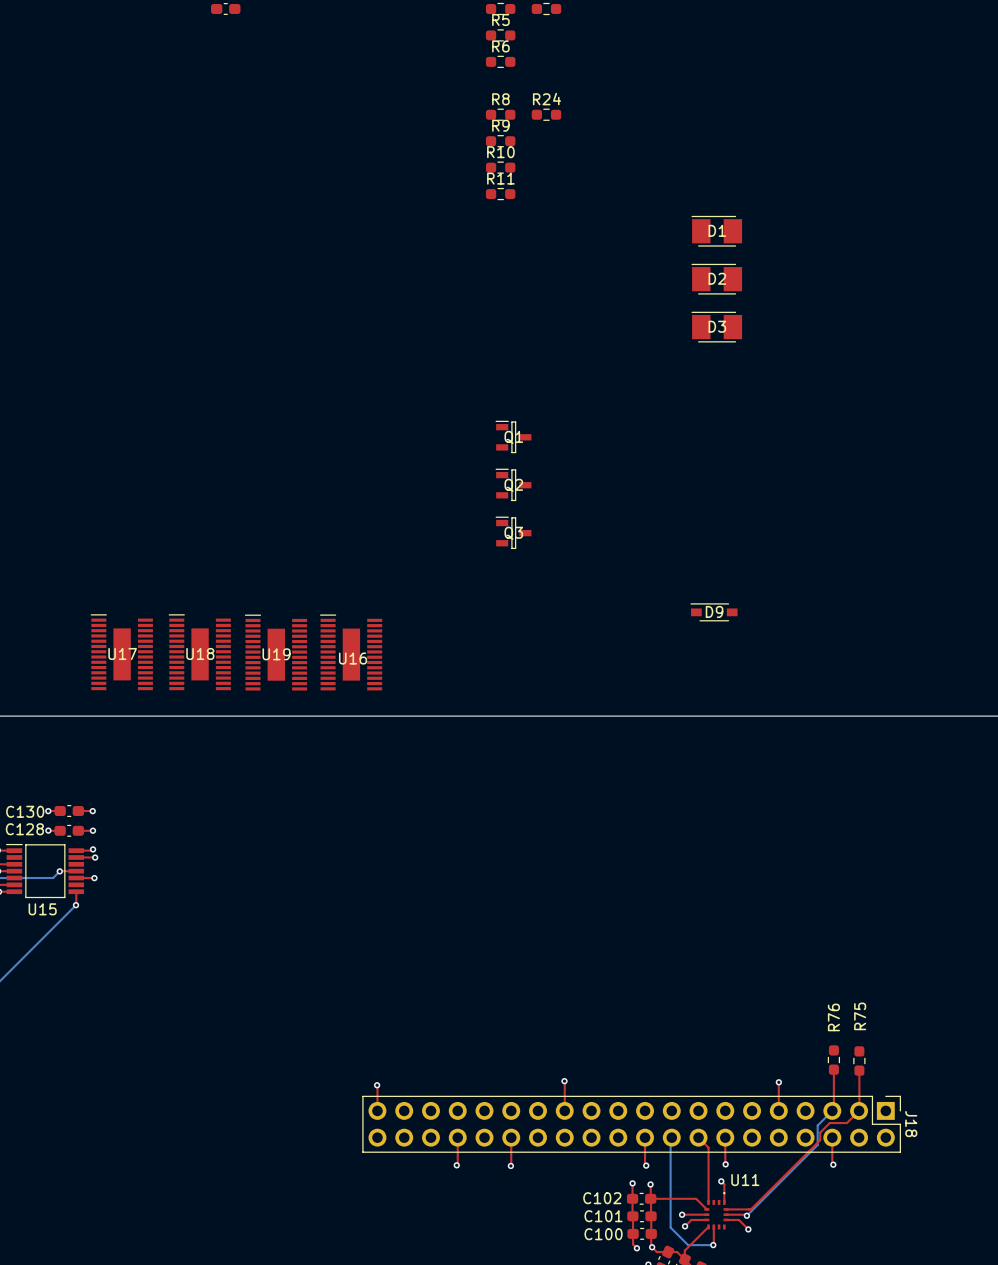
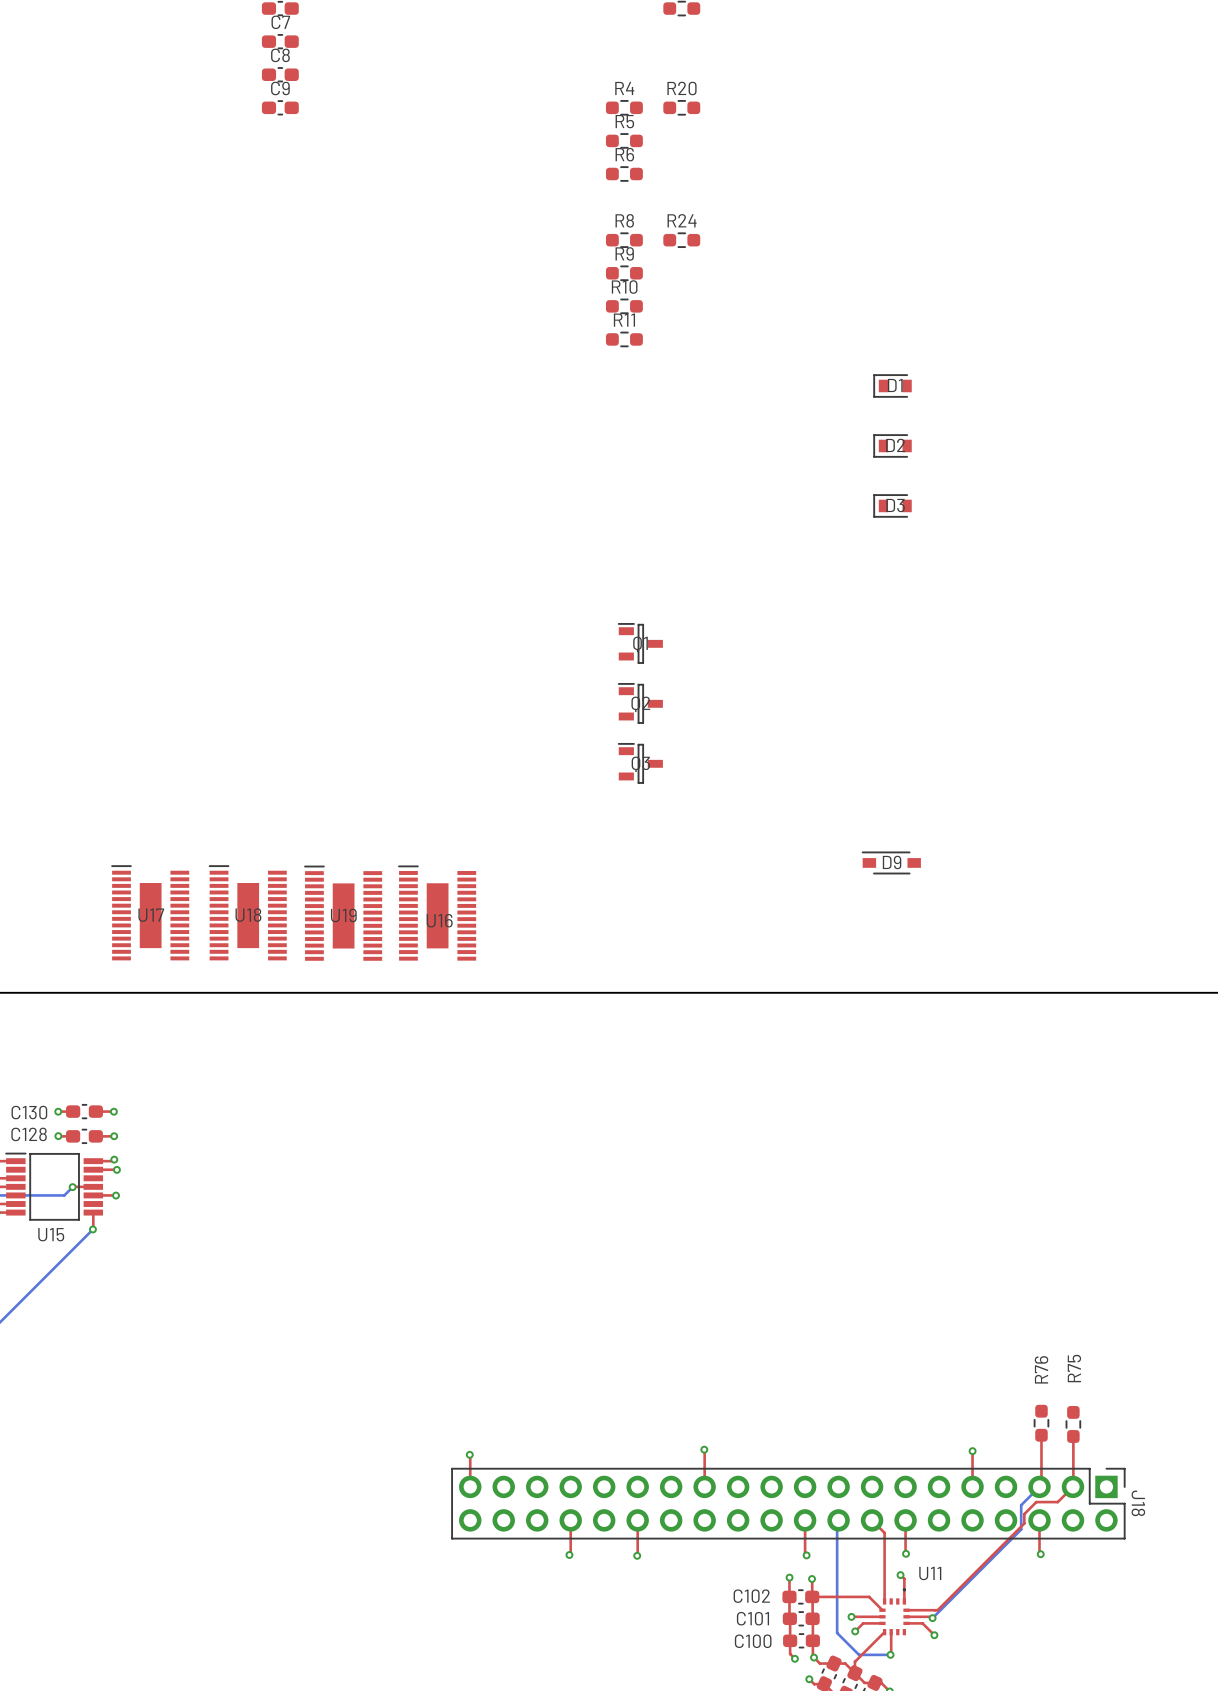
D1 footprint: [691, 215, 743, 247] -> [873, 374, 912, 398]
D2 footprint: [691, 263, 743, 295] -> [873, 434, 912, 458]
D3 footprint: [691, 311, 743, 343] -> [873, 494, 912, 518]

